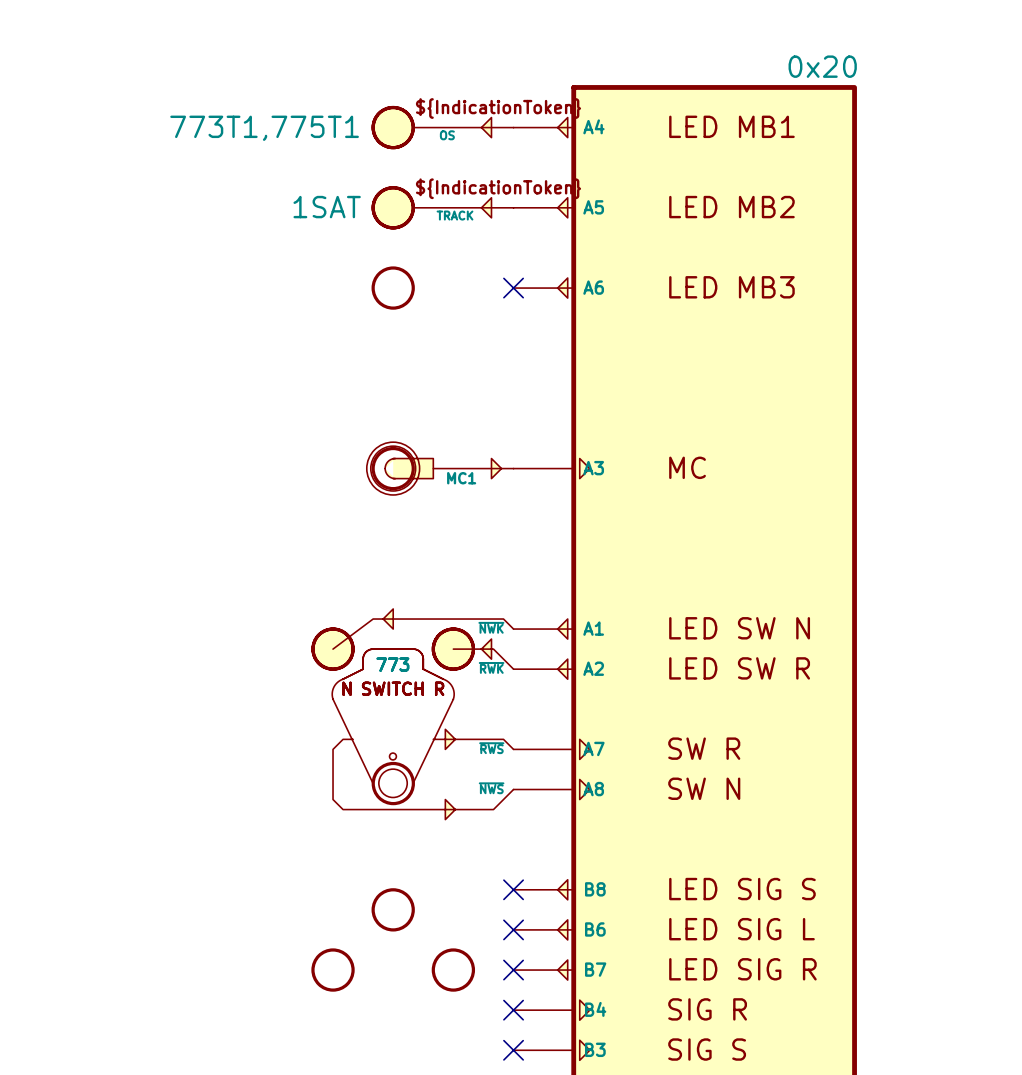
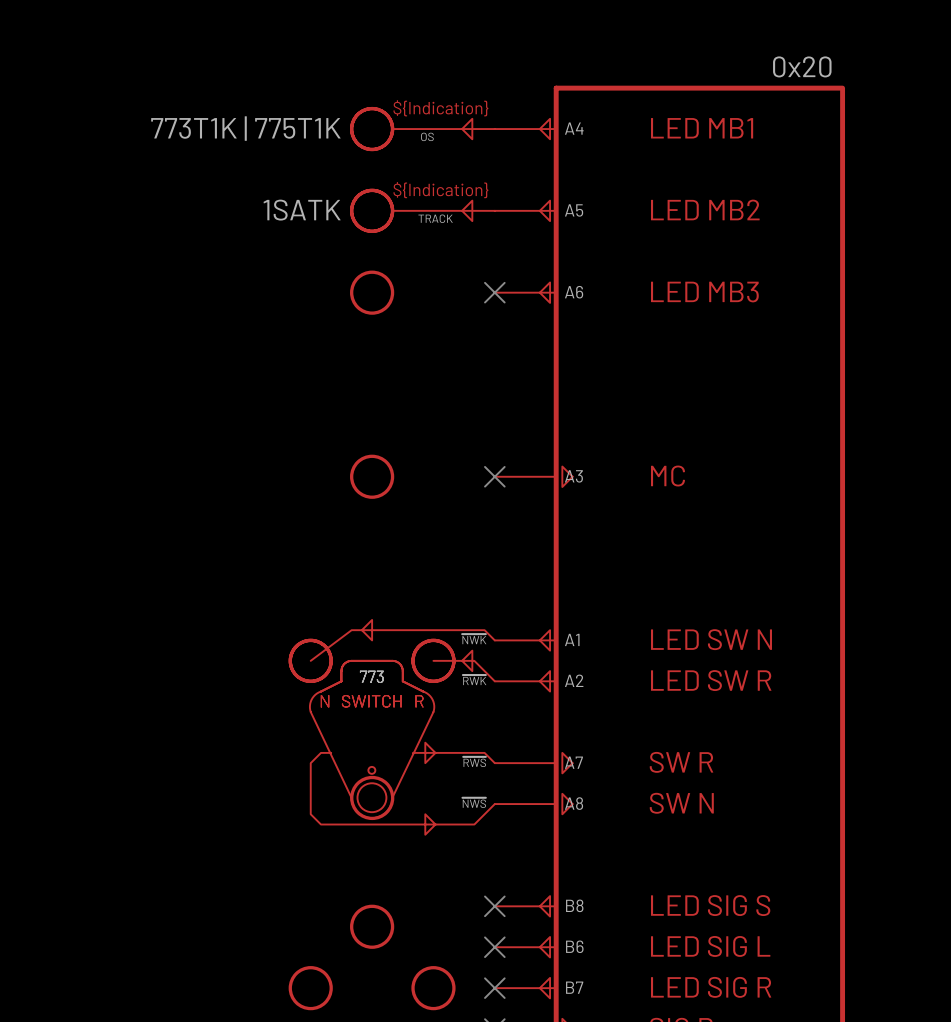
part text: ${IndicationToken} (498, 108) -> ${Indication} (440, 108)
part text: 773T1,775T1 (264, 128) -> none
part text: none -> 773T1K | 775T1K (245, 128)
part text: ${IndicationToken} (498, 188) -> ${Indication} (440, 190)
part text: none -> 1SATK (302, 210)
part text: 1SAT (327, 207) -> none
part: MC1 (440, 468) -> none
no-connect mark: none -> (494, 476)

